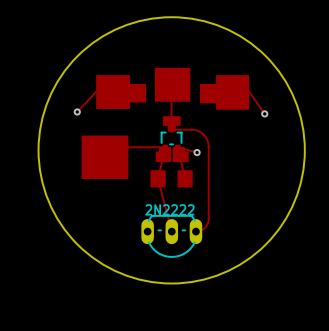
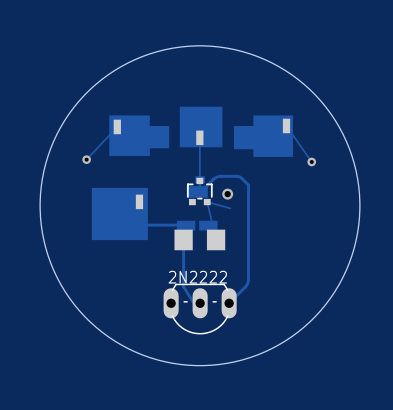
drawing position: (171, 121) -> (197, 191)
track: (171, 129) (198, 130) (205, 136) (208, 142) (208, 220) (203, 228) (195, 231) -> (199, 180) (199, 194) (196, 195) (213, 179) (218, 176) (238, 176) (248, 185) (248, 280) (246, 286) (225, 307)
via: none -> (227, 194)
drawing: [155, 146, 189, 163] -> none
track: (121, 147) (165, 147) (158, 178) (171, 231) -> none
via: (197, 152) -> none
drawing: none -> [176, 220, 218, 231]
track: none -> (130, 225) (187, 226) (183, 233) (183, 286) (196, 307)

